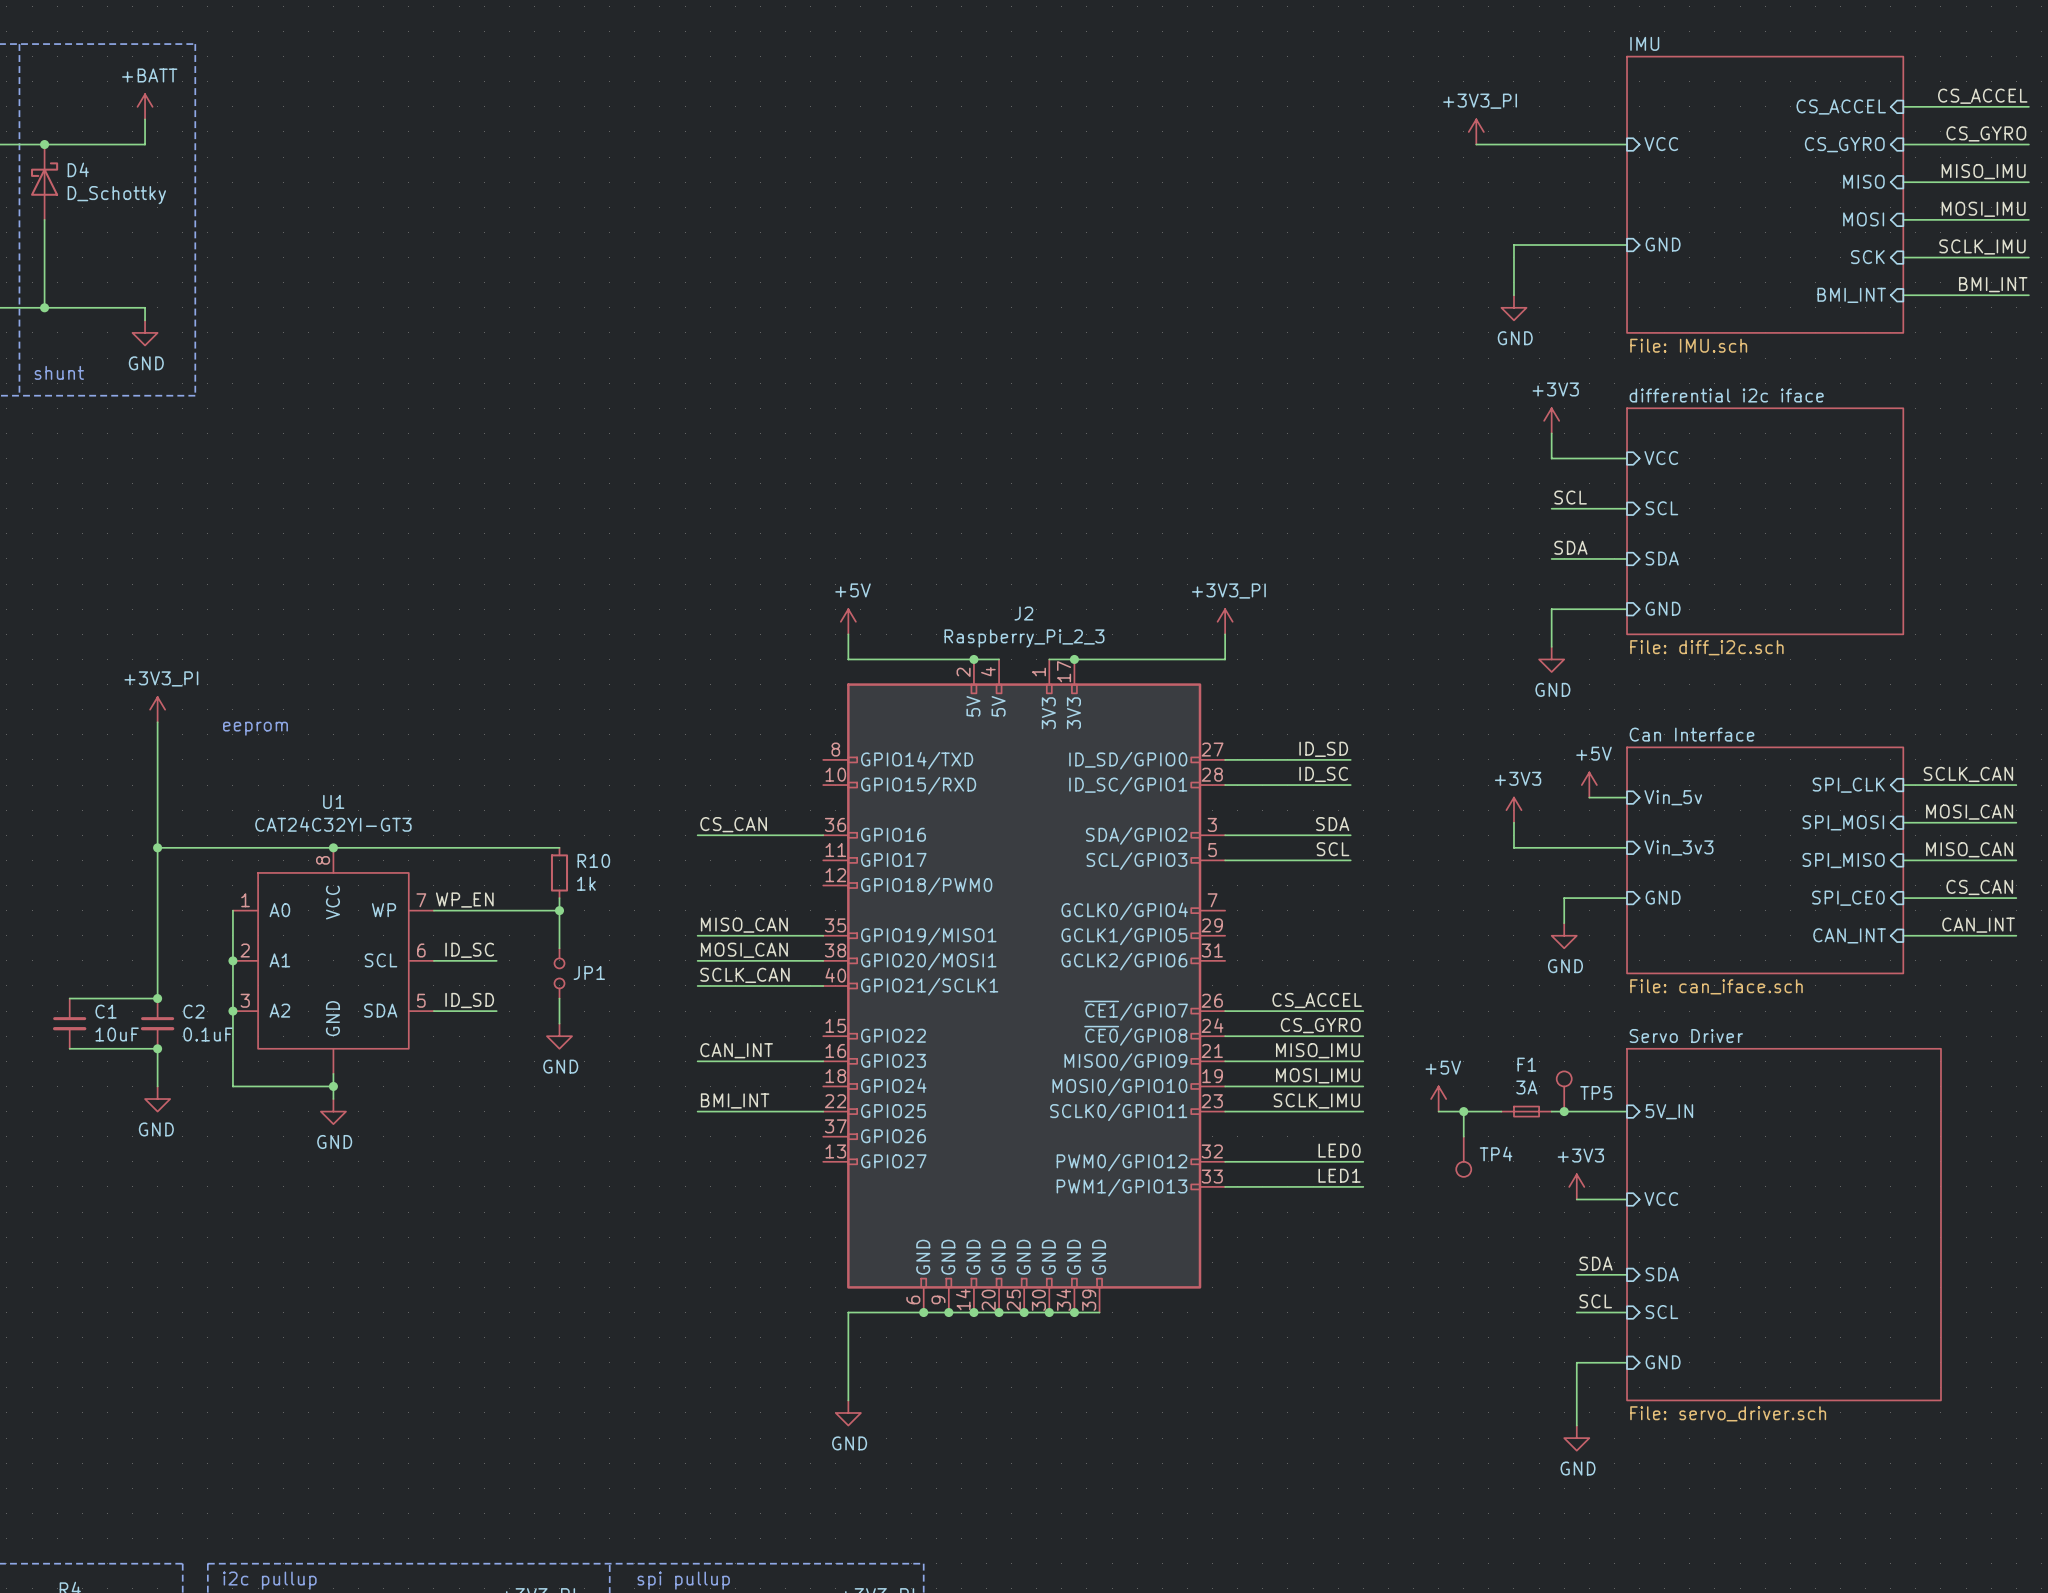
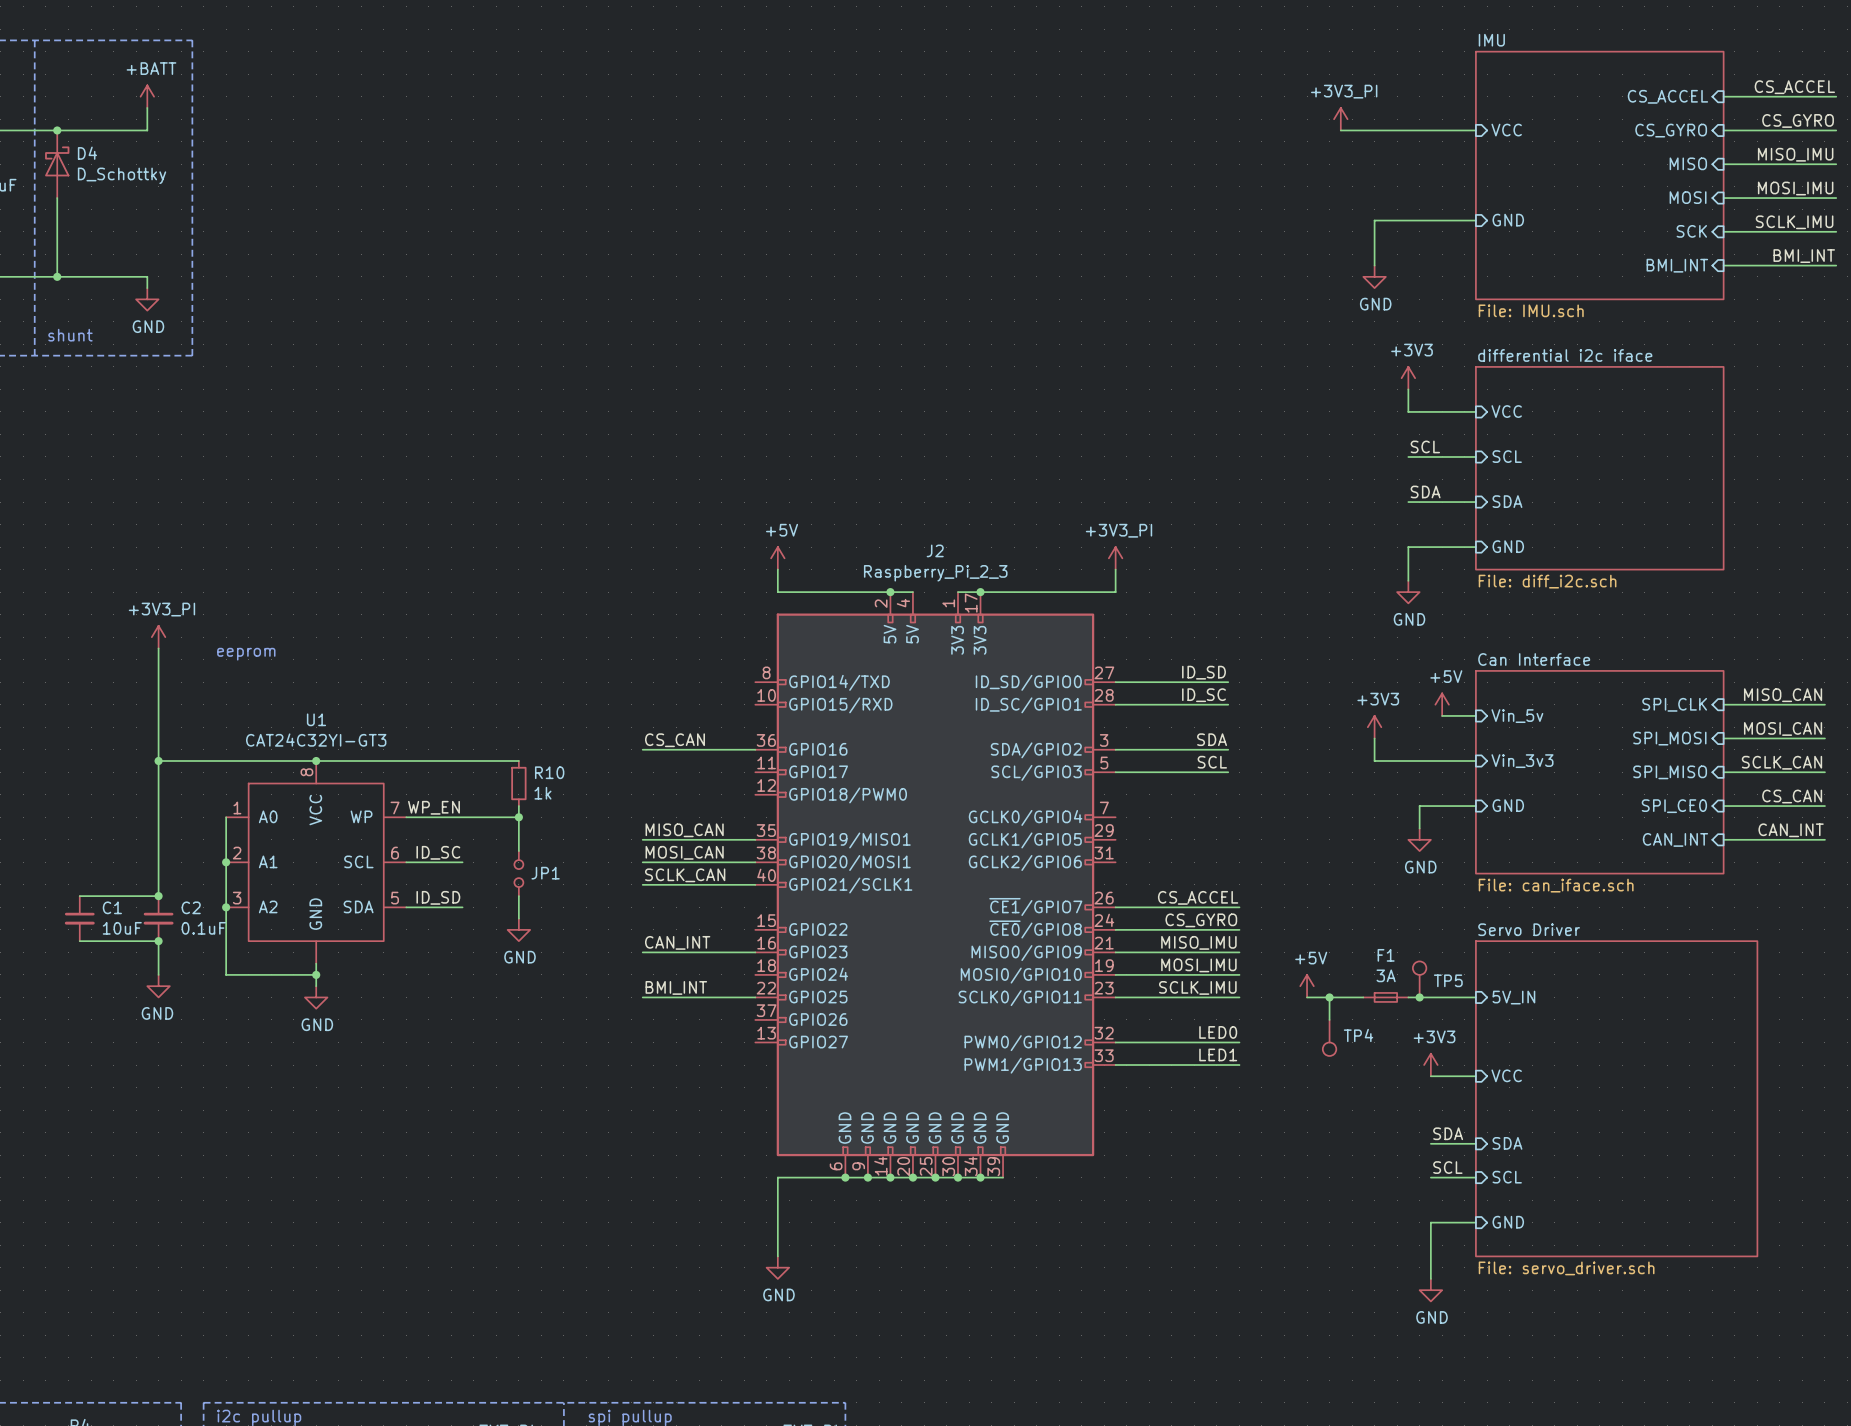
label: SCLK_CAN (1968, 774) -> MISO_CAN (1783, 695)
label: MISO_CAN (1969, 849) -> SCLK_CAN (1781, 762)

